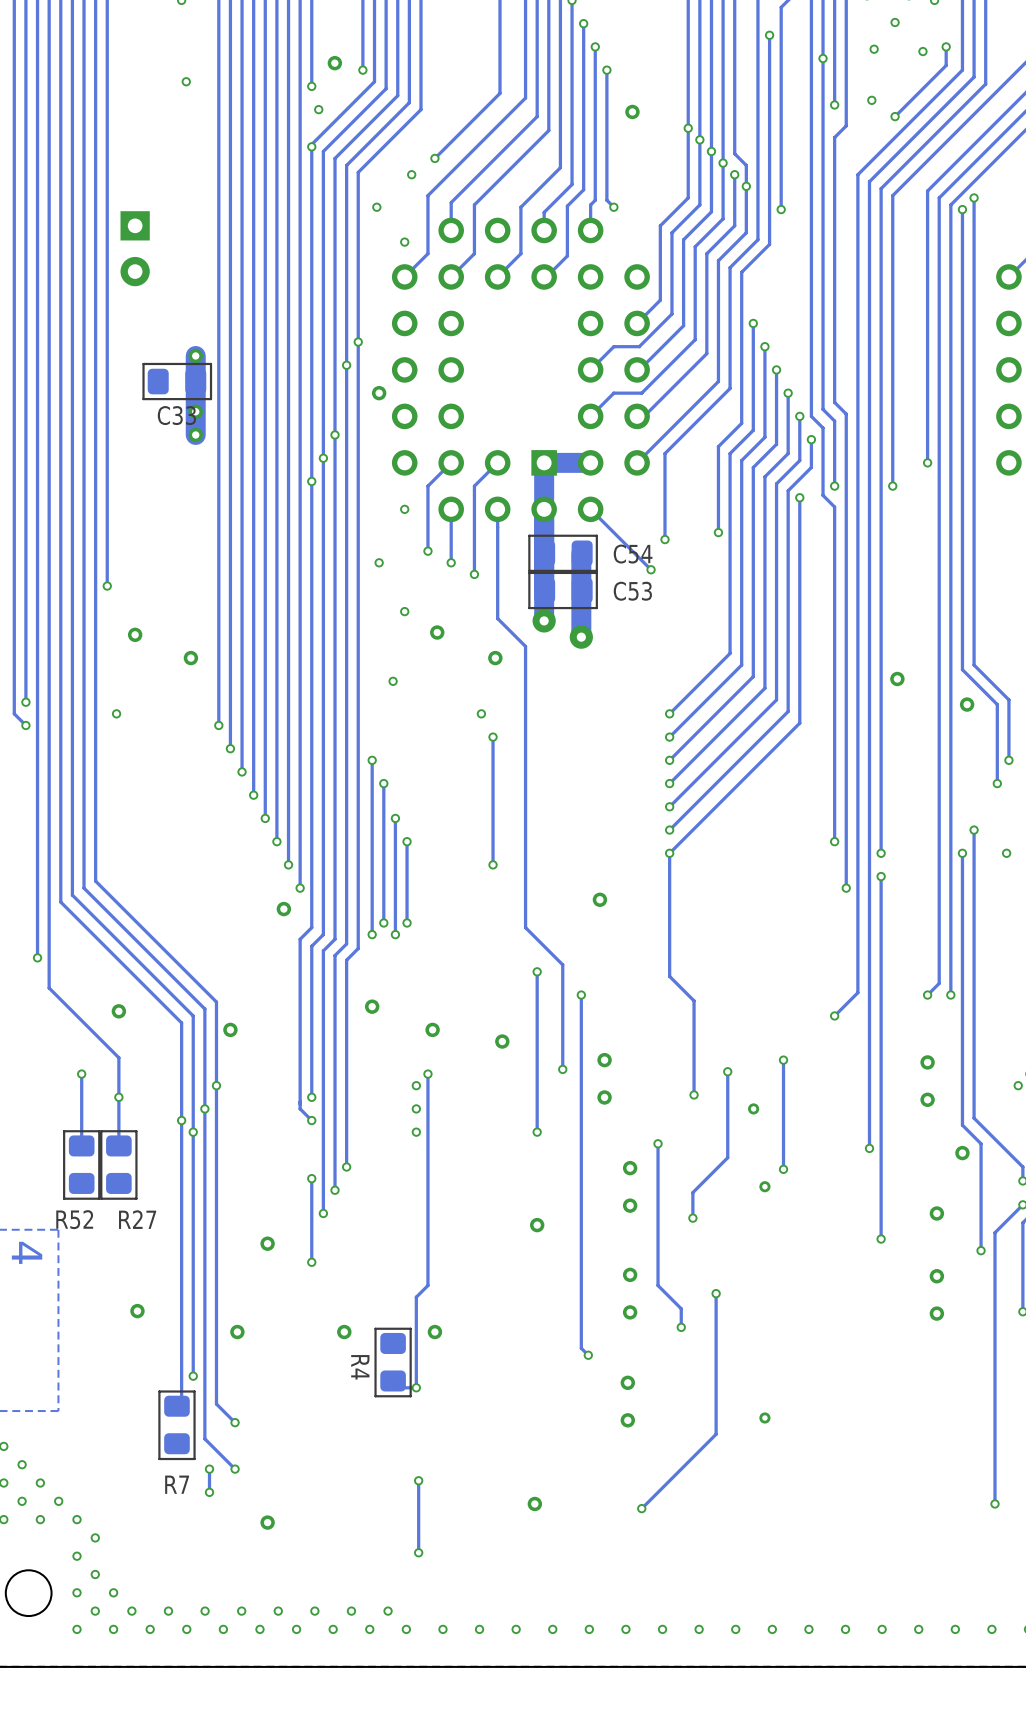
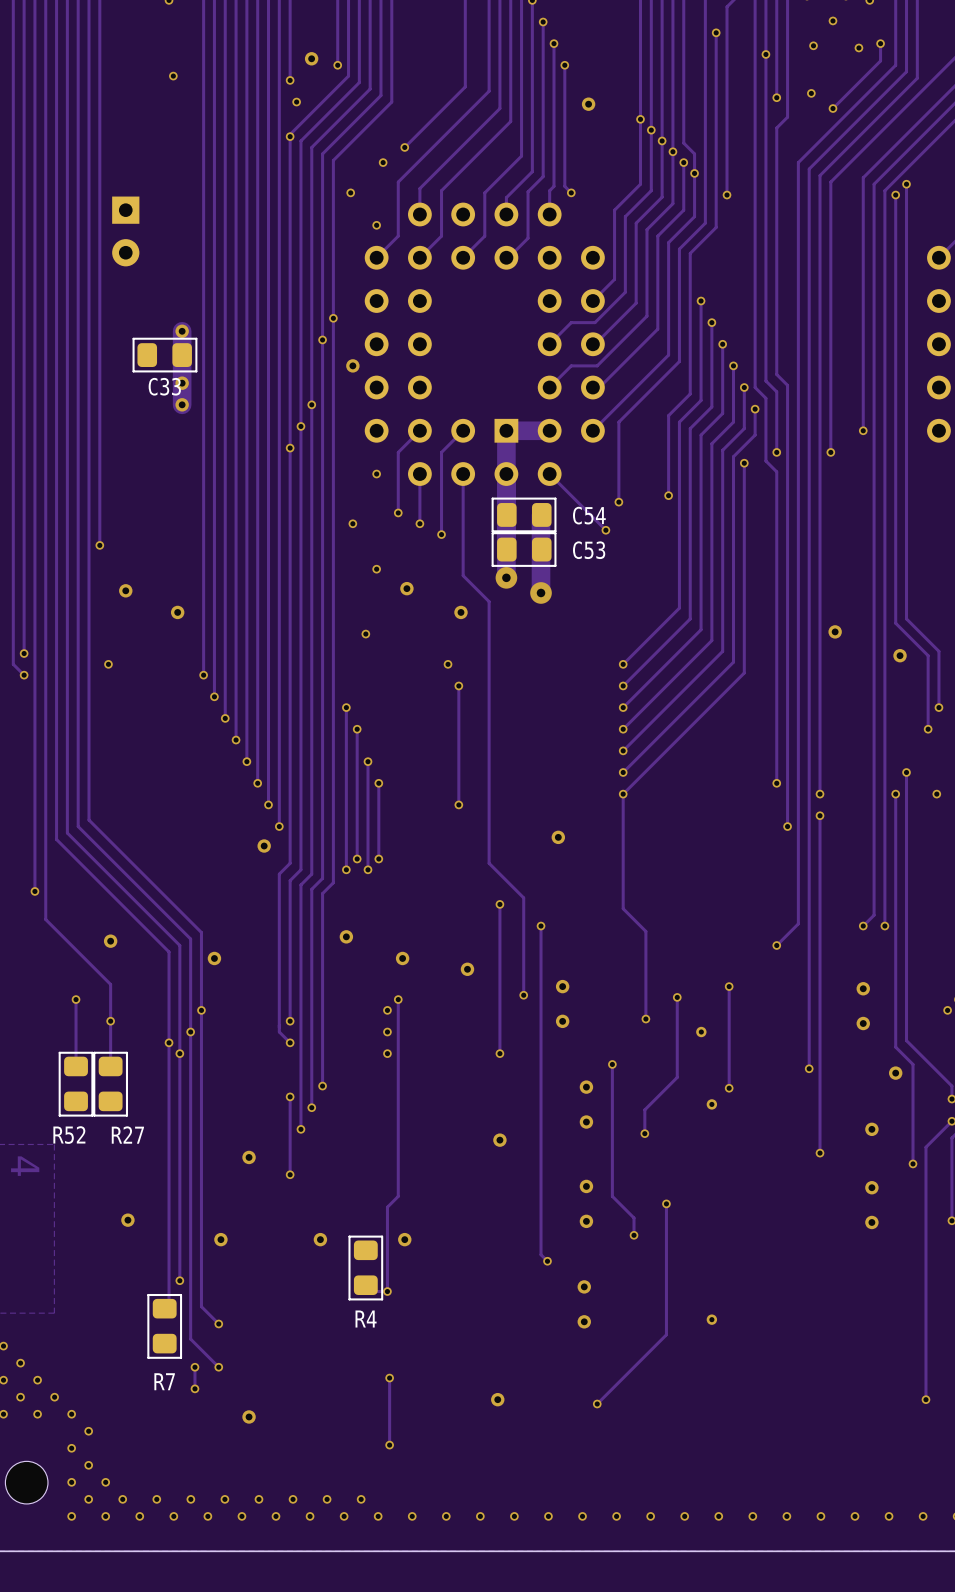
R4 name rotation: 0° (360, 1367) -> 90° counterclockwise (366, 1319)
R4 name position: R4 (360, 1367) -> R4 (366, 1319)

